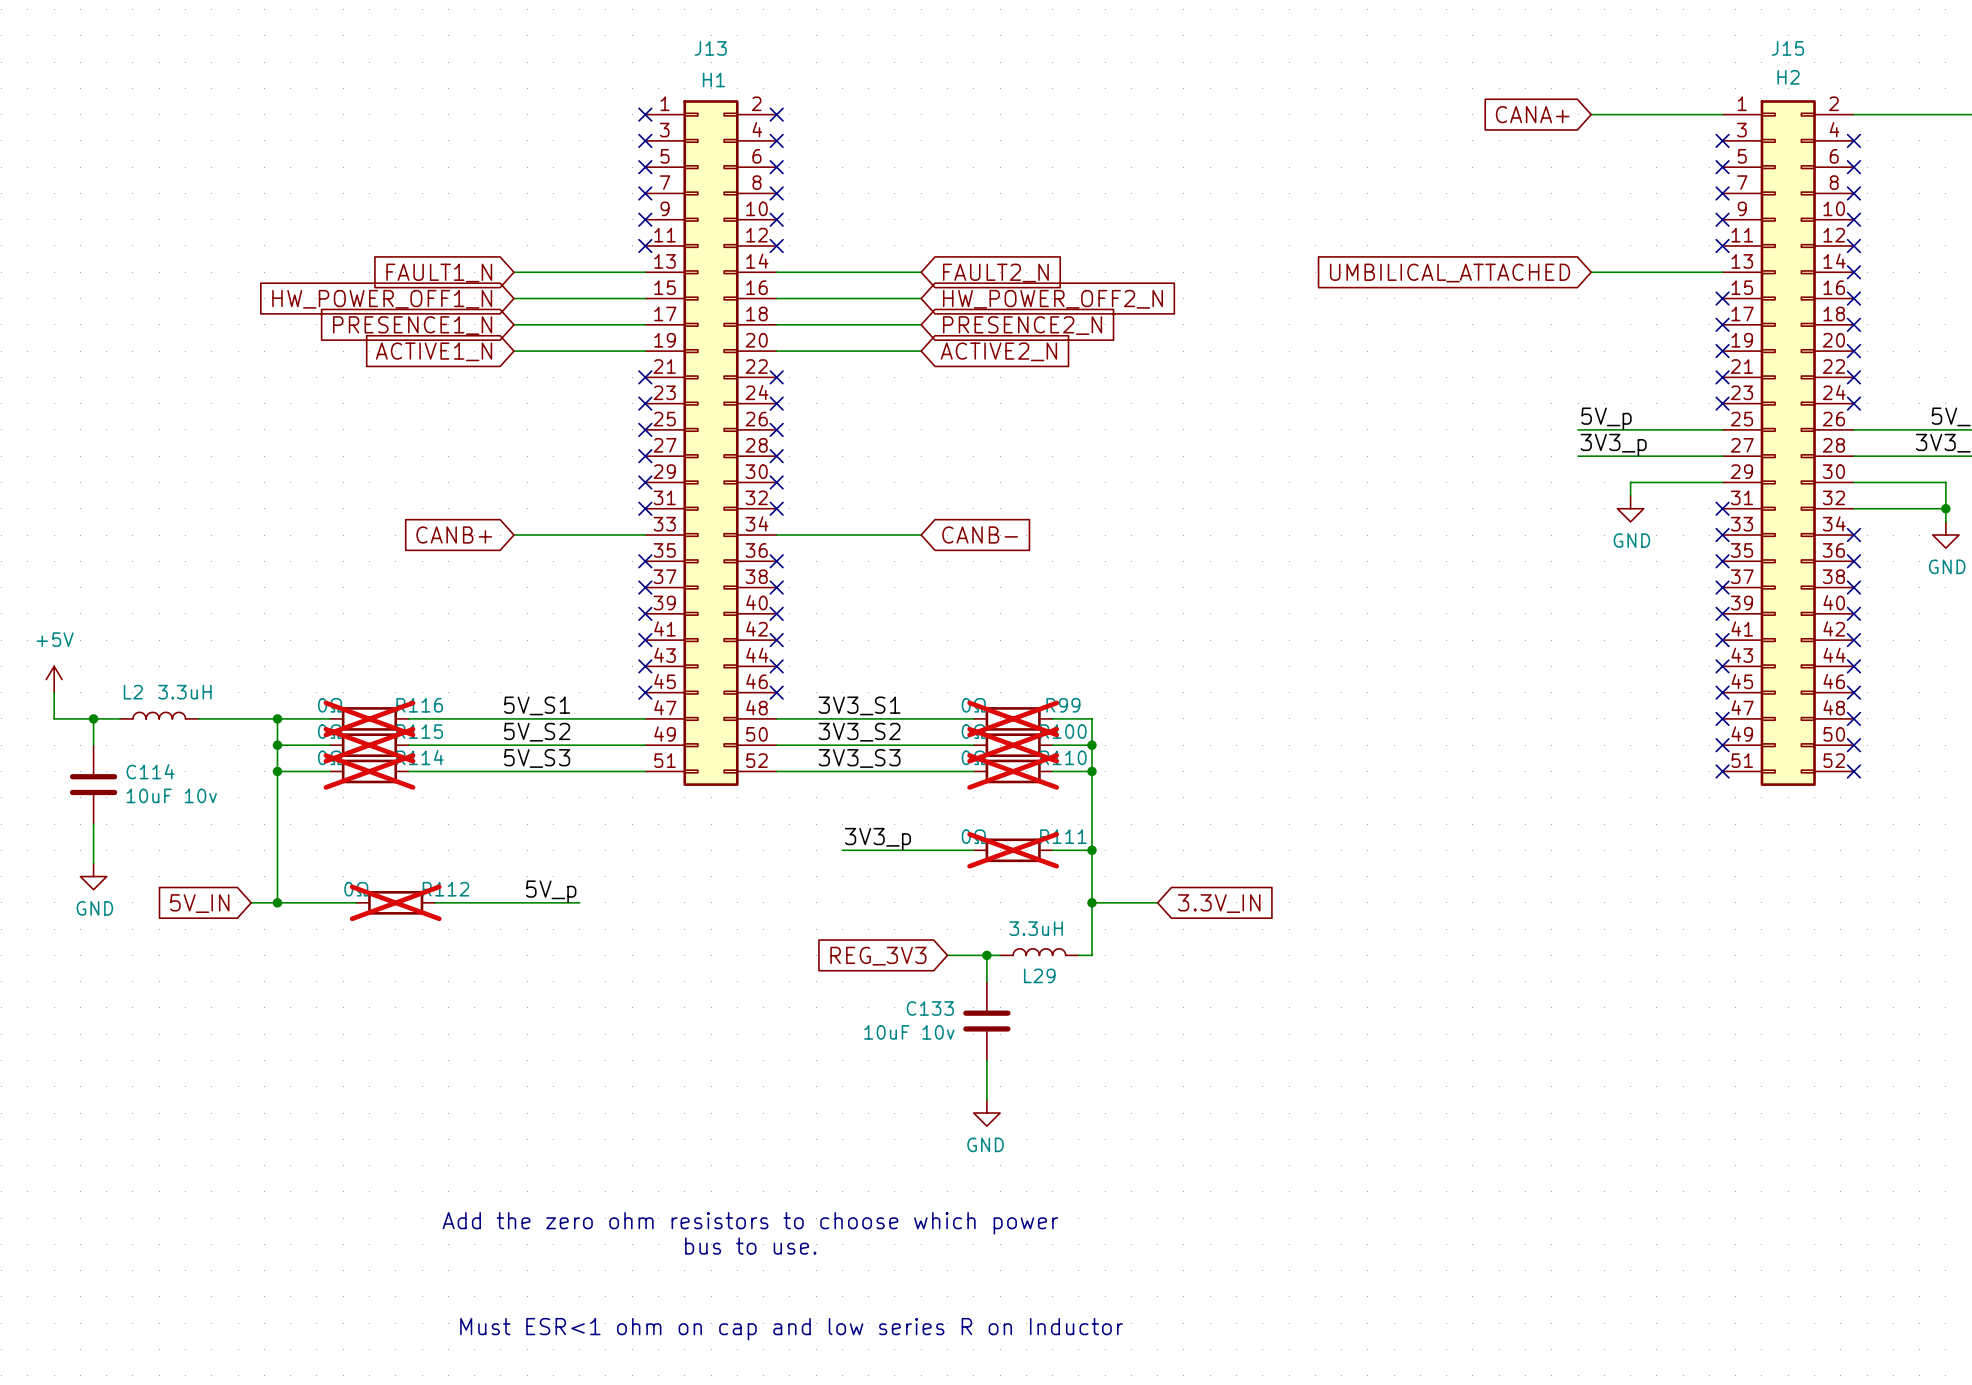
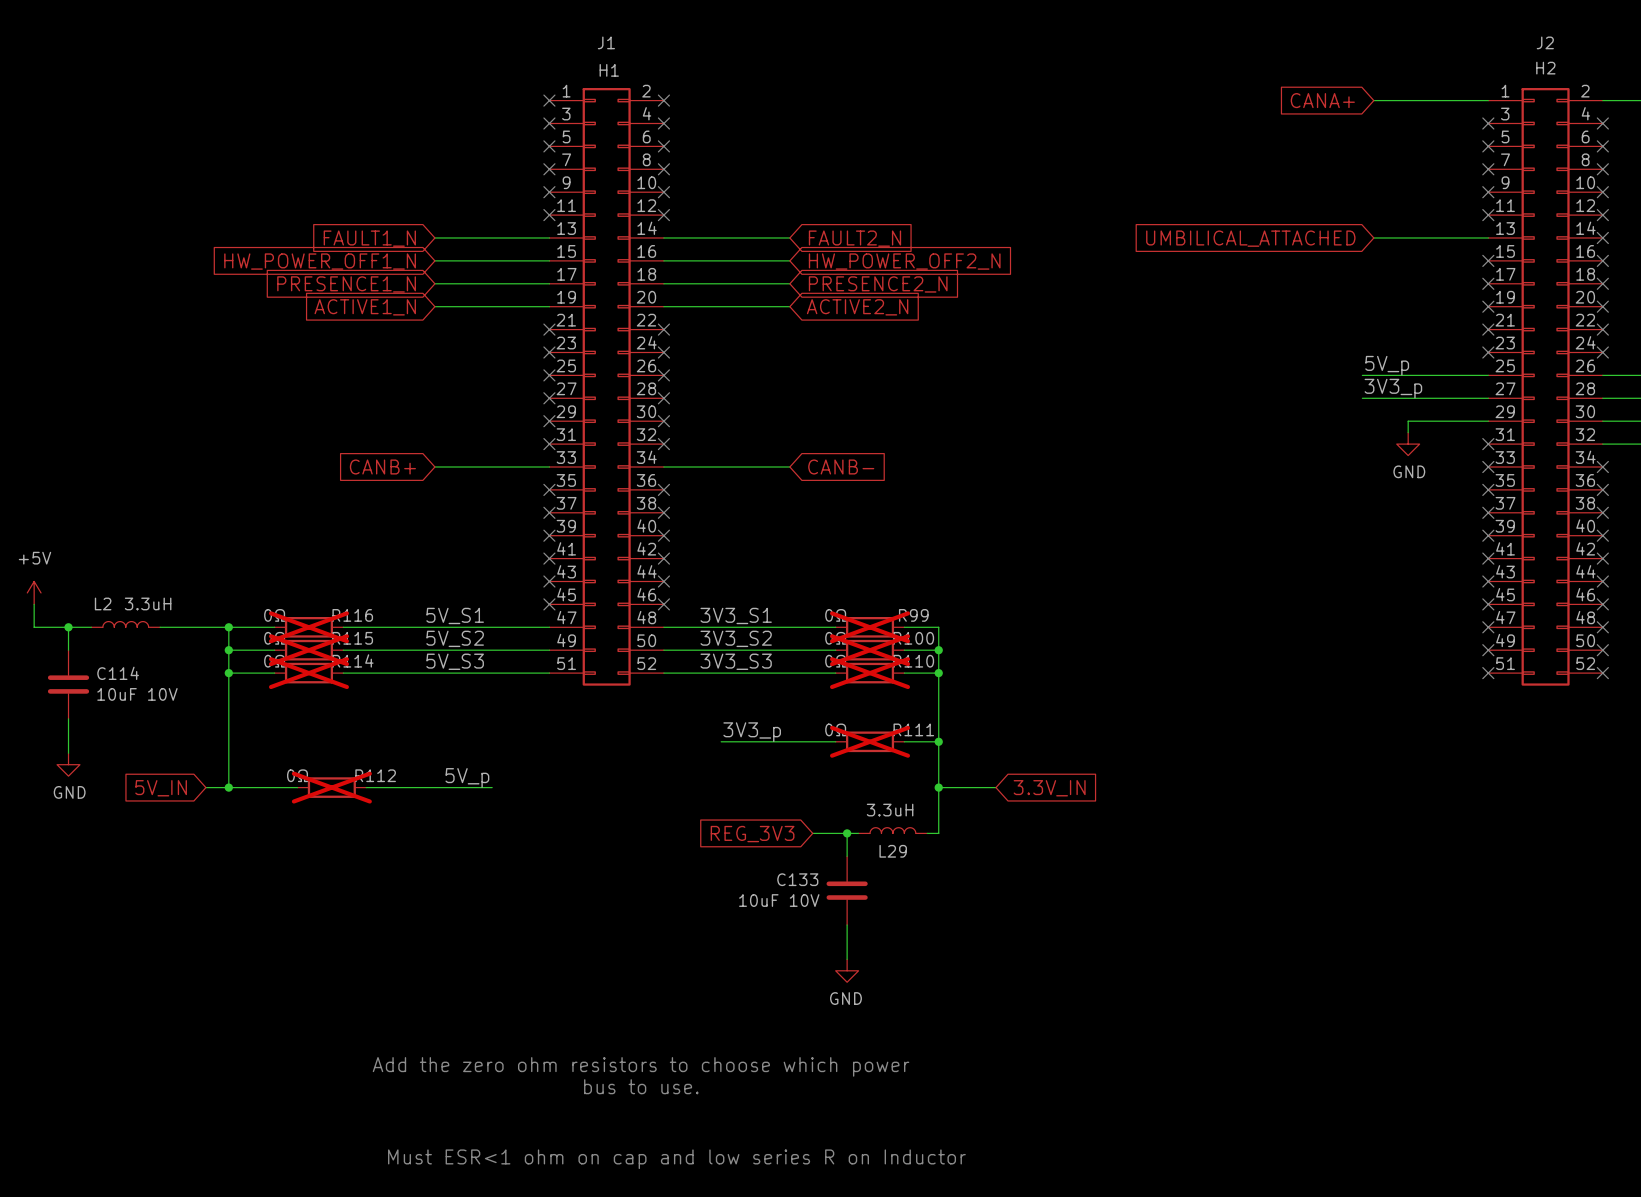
J13 name: J13 (710, 48) -> J1 (606, 42)
J15 name: J15 (1787, 48) -> J2 (1545, 42)
C114 value: 10uF 10v (171, 795) -> 10uF 10V (137, 694)
C133 value: 10uF 10v (909, 1032) -> 10uF 10V (779, 900)

